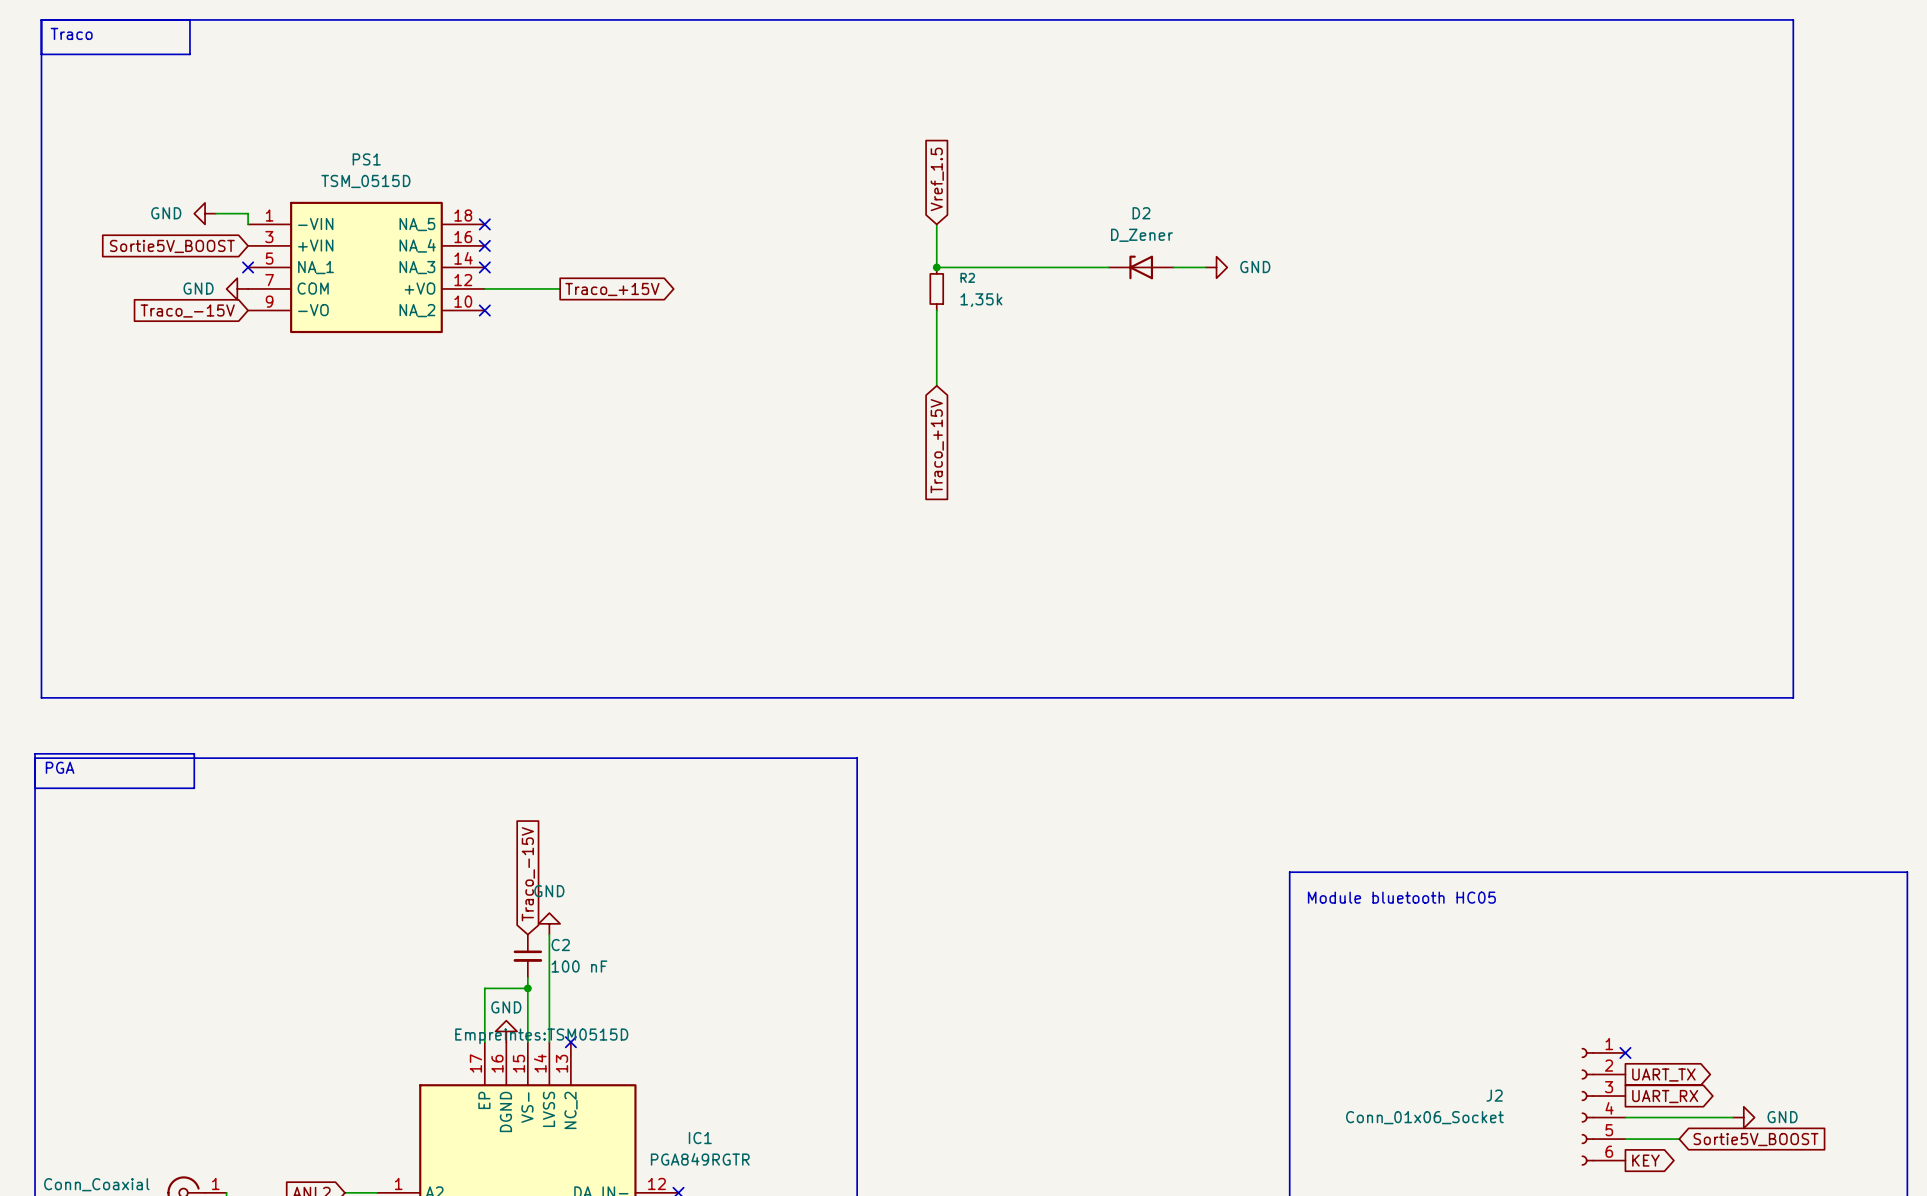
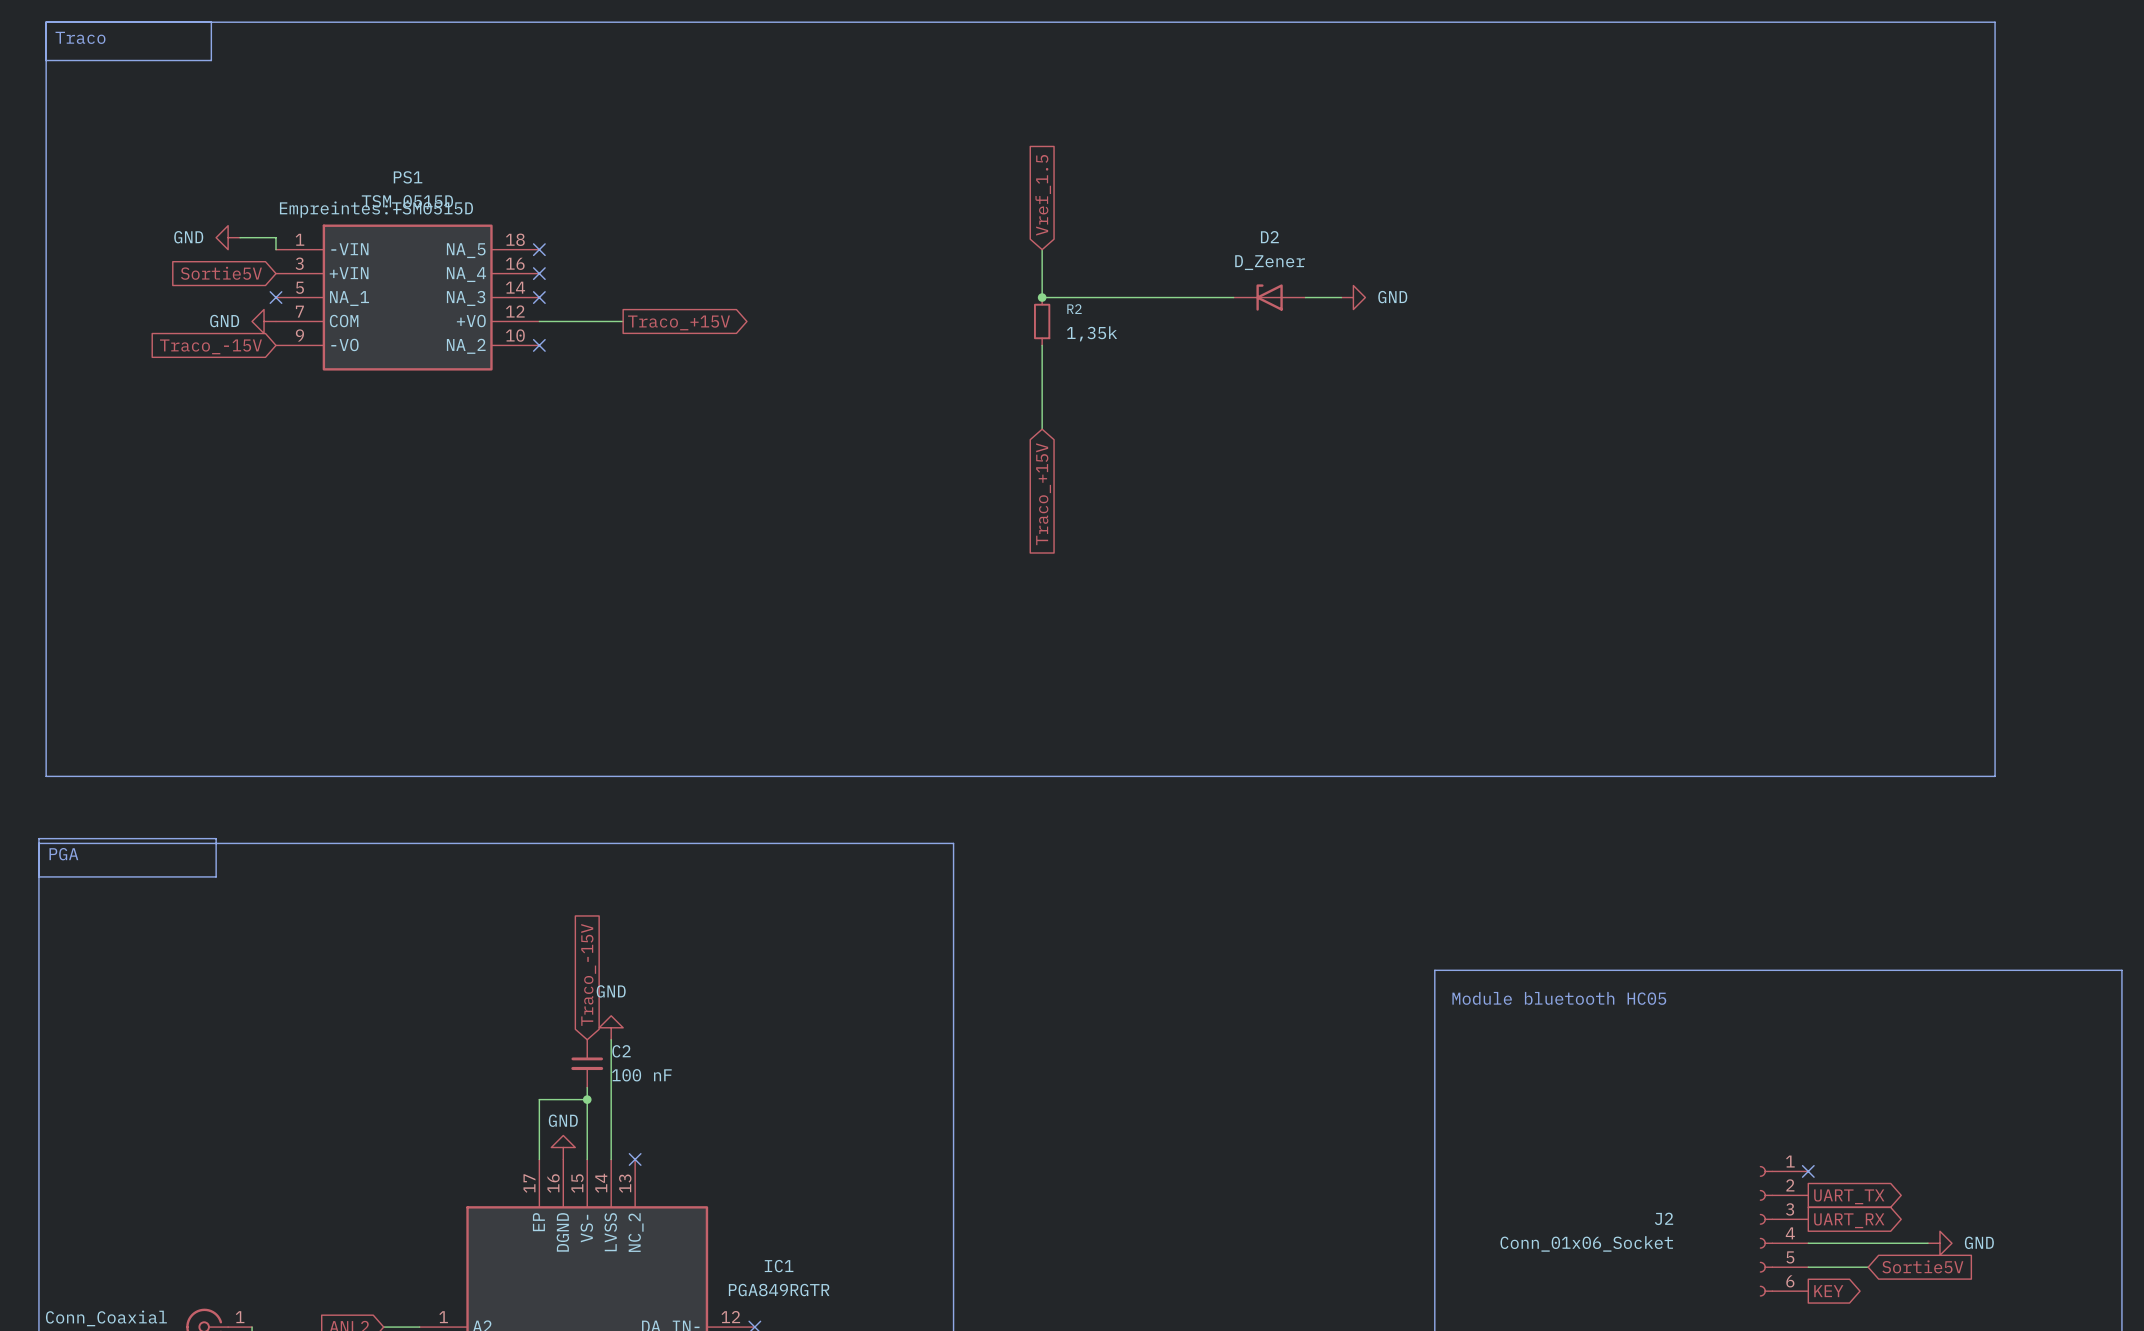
global label: Sortie5V_BOOST (172, 246) -> Sortie5V (221, 273)
PS1 text position: Empreintes:TSM0515D (541, 1036) -> Empreintes:TSM0515D (376, 209)
global label: Sortie5V_BOOST (1755, 1139) -> Sortie5V (1922, 1266)

